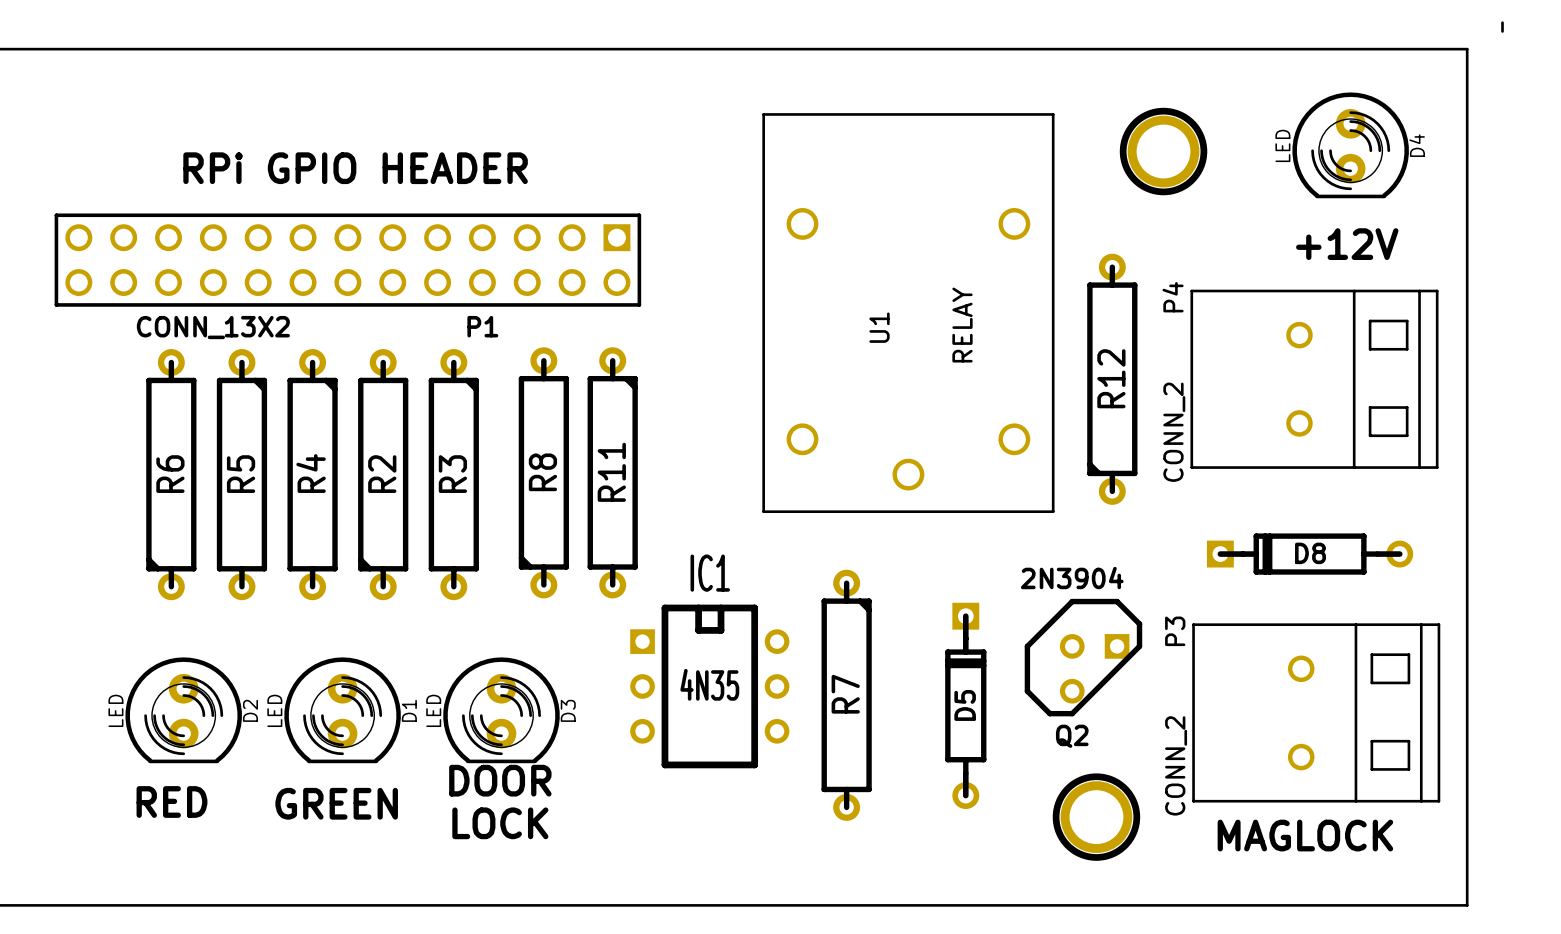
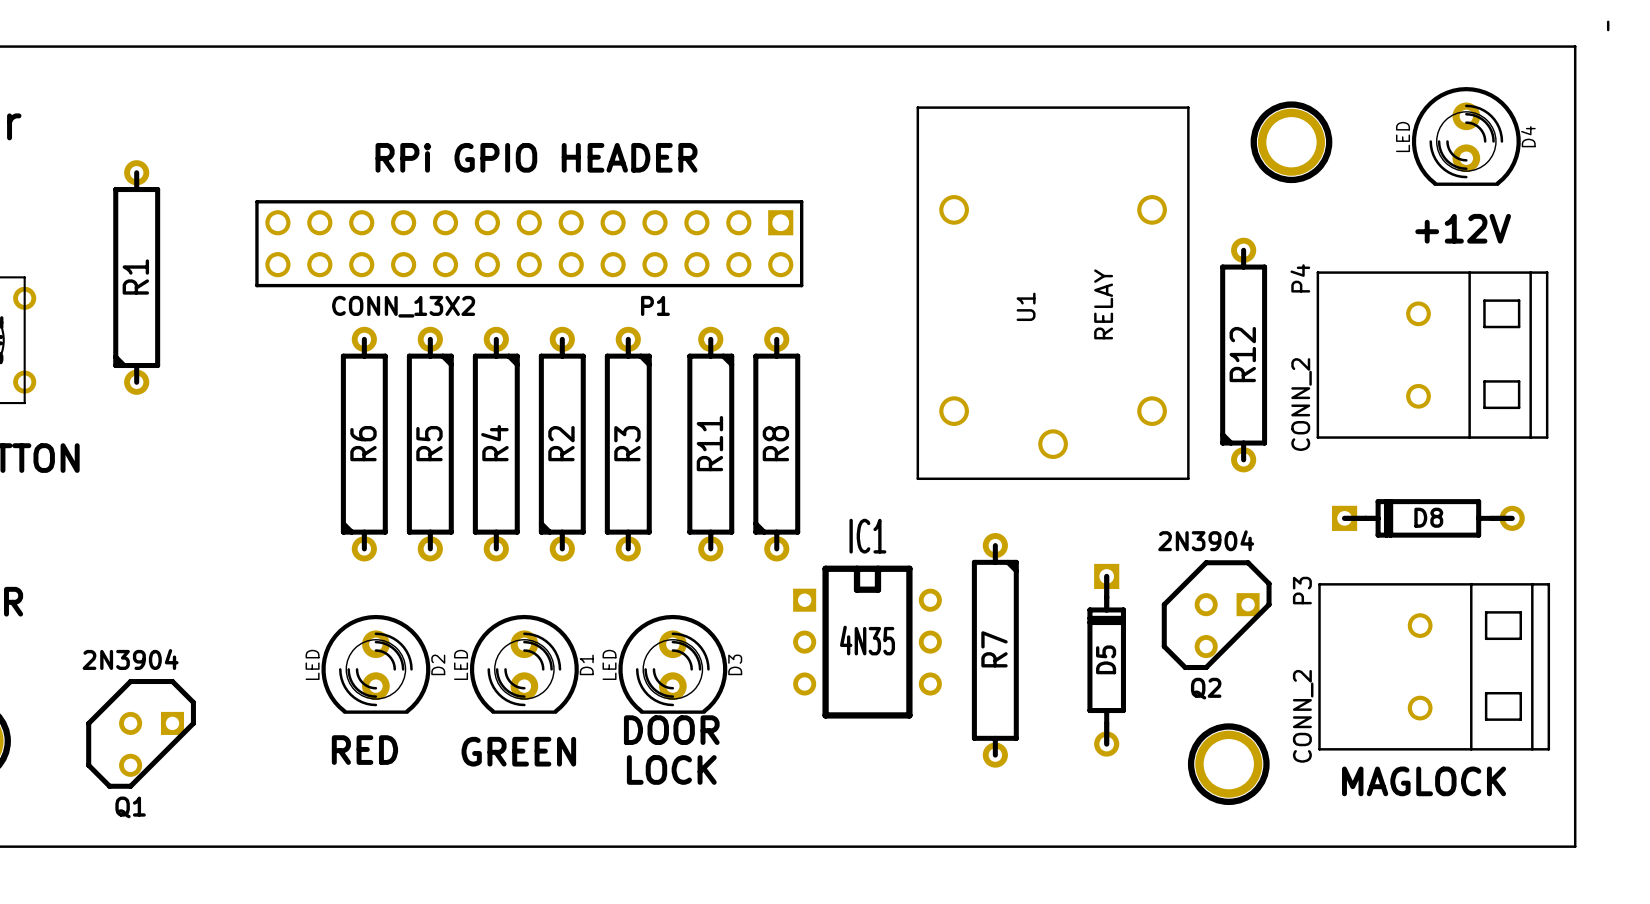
R8 position: (543, 472) -> (776, 444)
R11 position: (612, 472) -> (710, 444)

